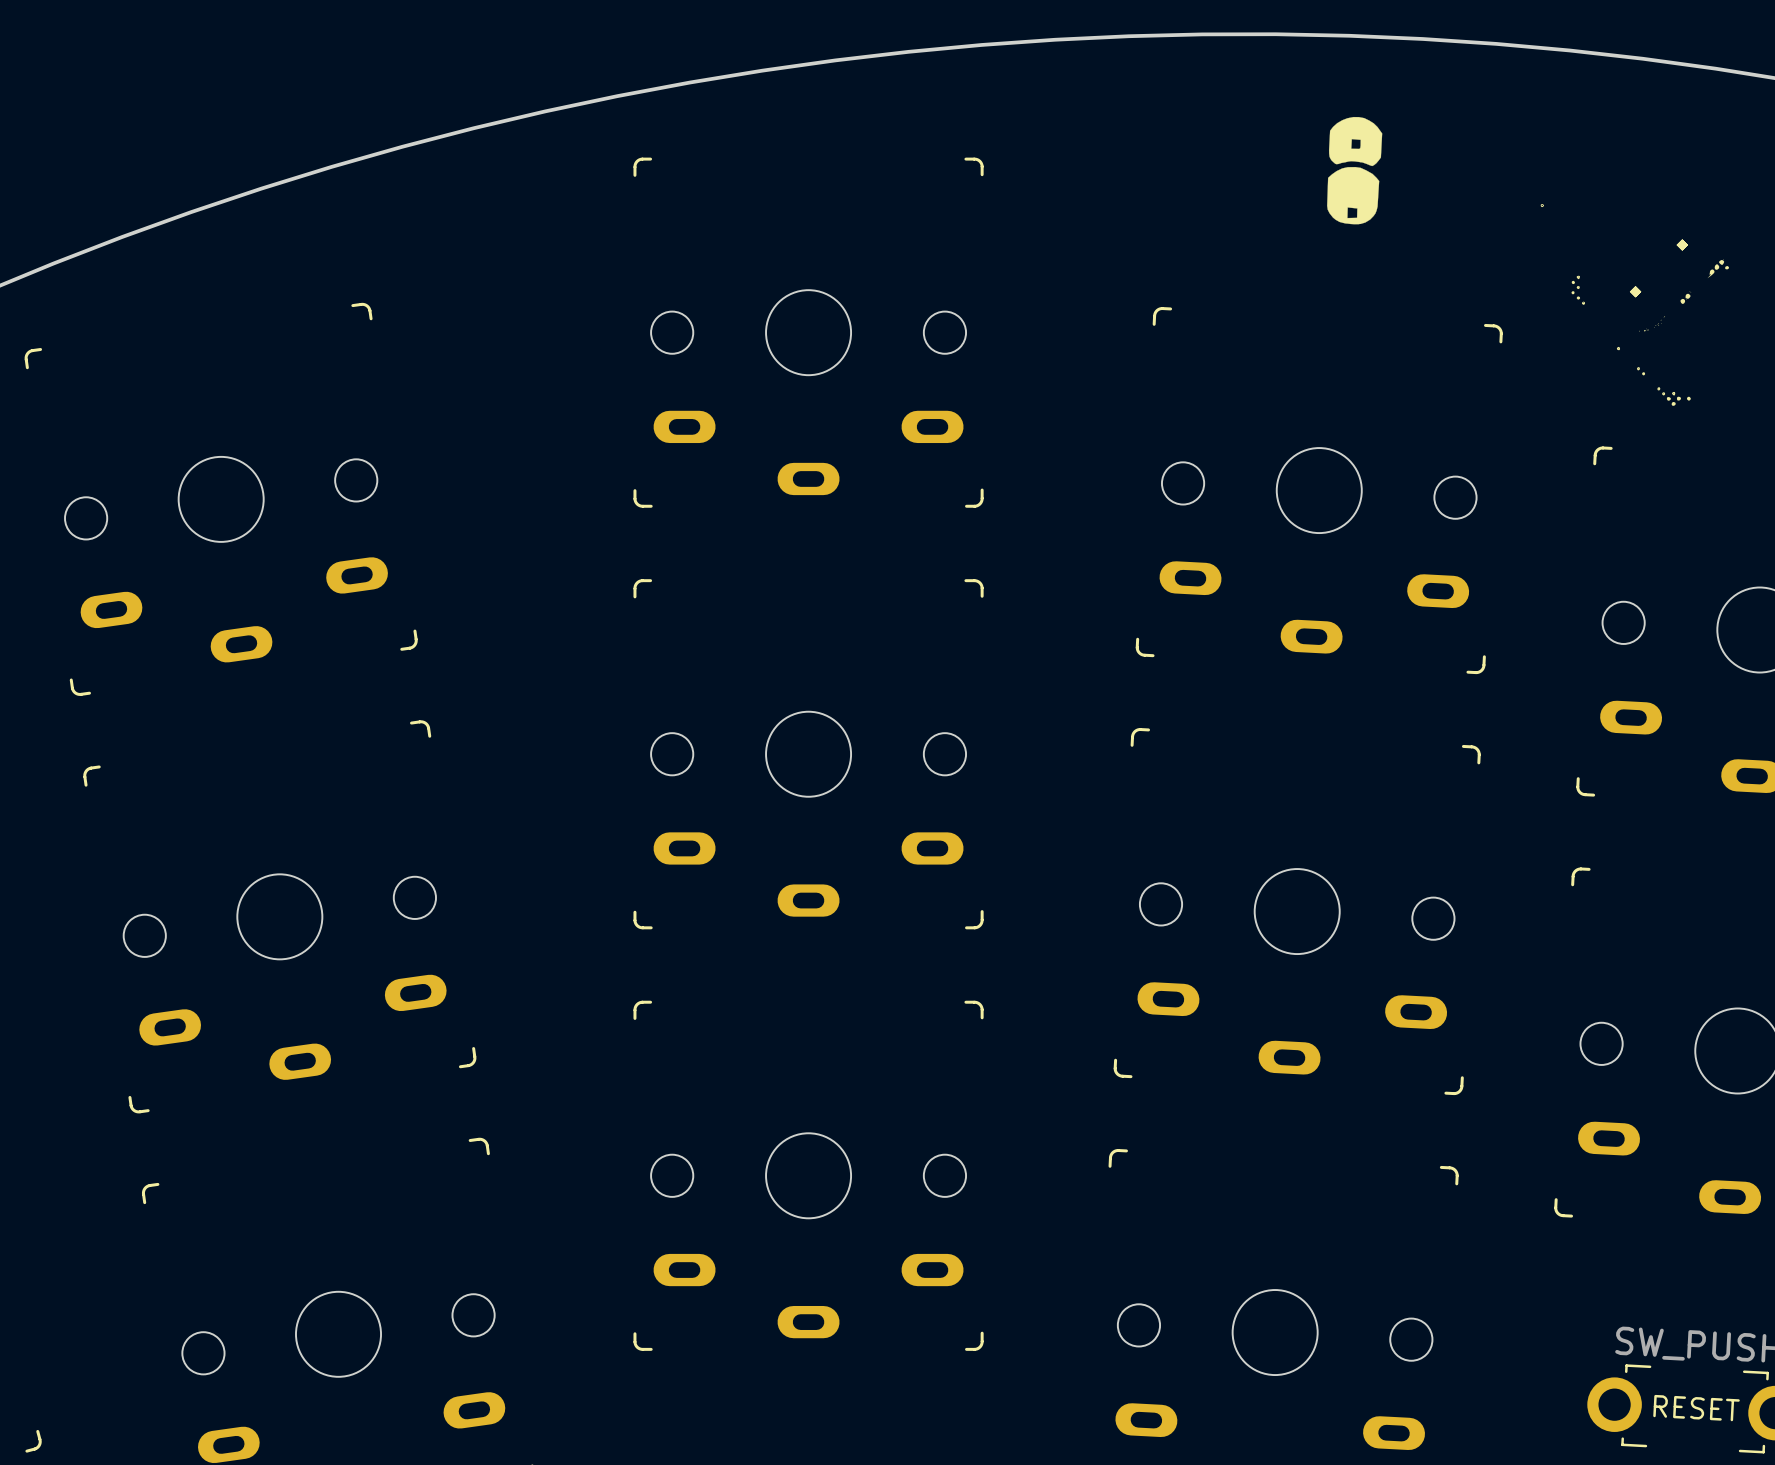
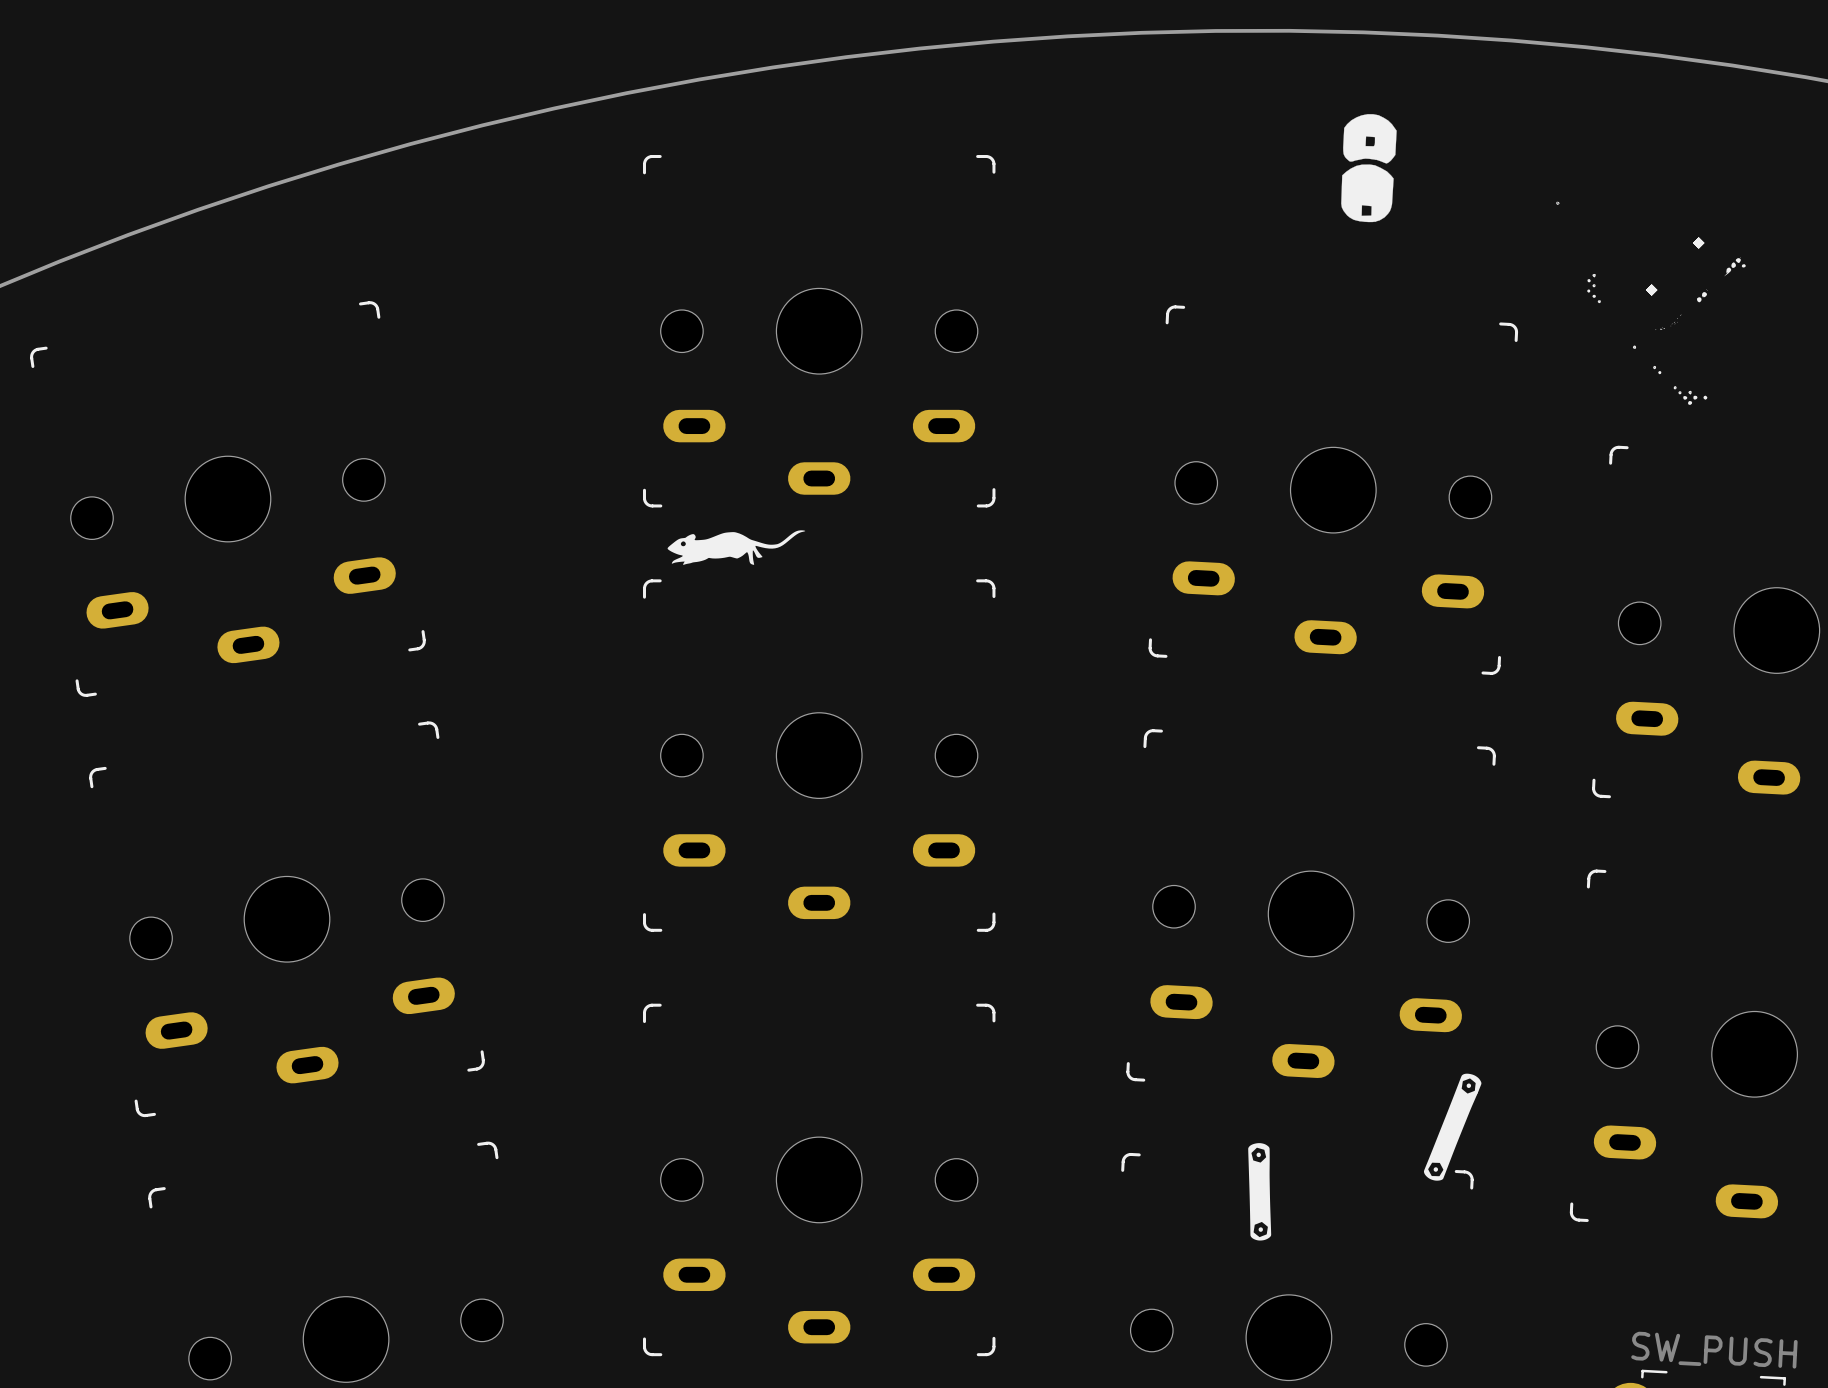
drawing: none -> [667, 530, 806, 565]
drawing: none -> [1423, 1073, 1482, 1181]
drawing: none -> [1248, 1143, 1272, 1241]

